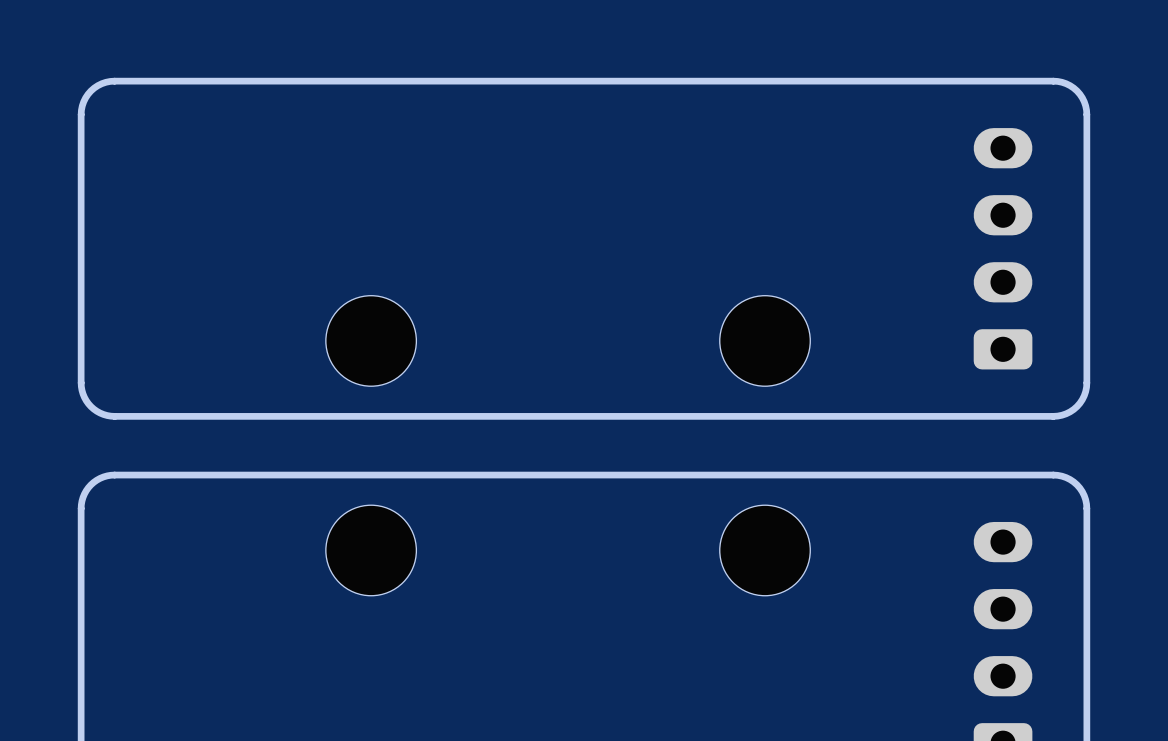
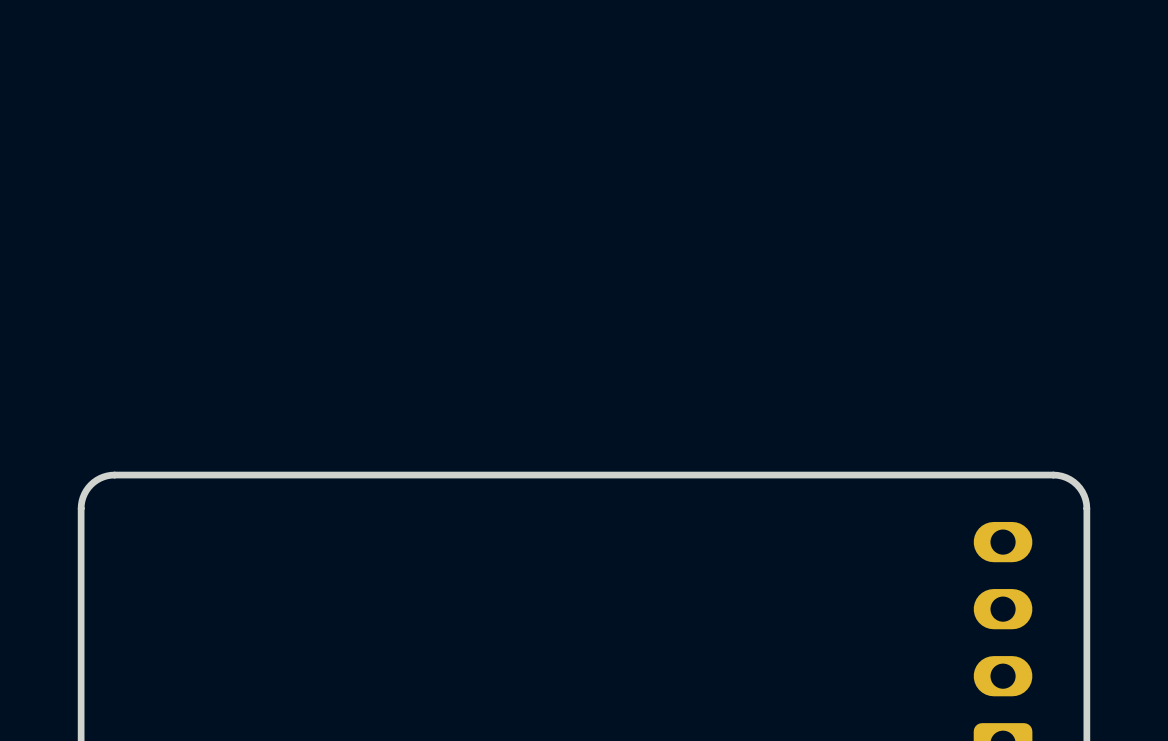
board edge: (1053, 81) (105, 82) (90, 90) (83, 101) (81, 110) (81, 382) (83, 393) (88, 403) (96, 411) (114, 416) (1062, 415) (1077, 406) (1084, 395) (1086, 387) (1086, 114) (1084, 101) (1077, 90) (1066, 83) (1053, 81) -> none
part: (1003, 248) -> none
part: (371, 340) -> none
part: (765, 340) -> none
part: (371, 550) -> none
part: (765, 550) -> none

